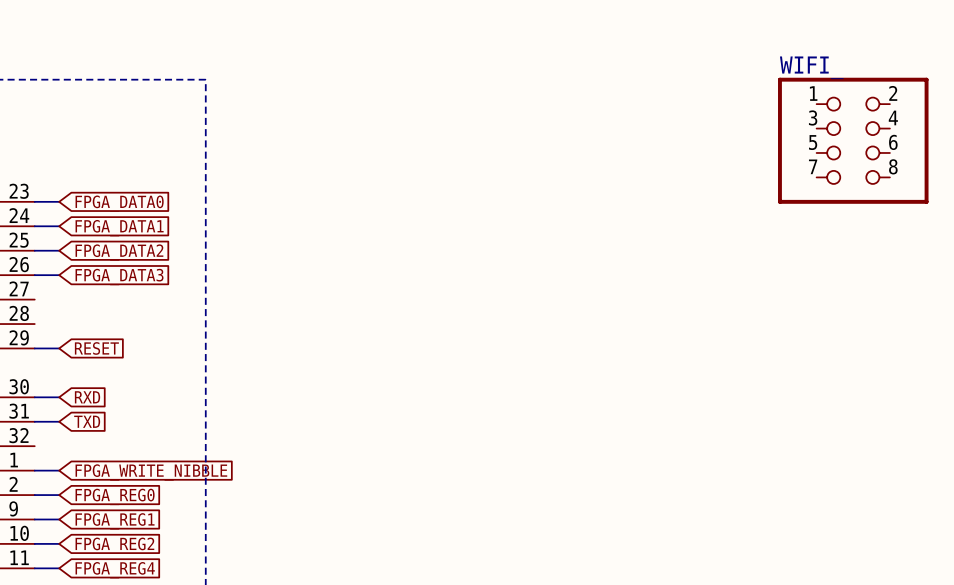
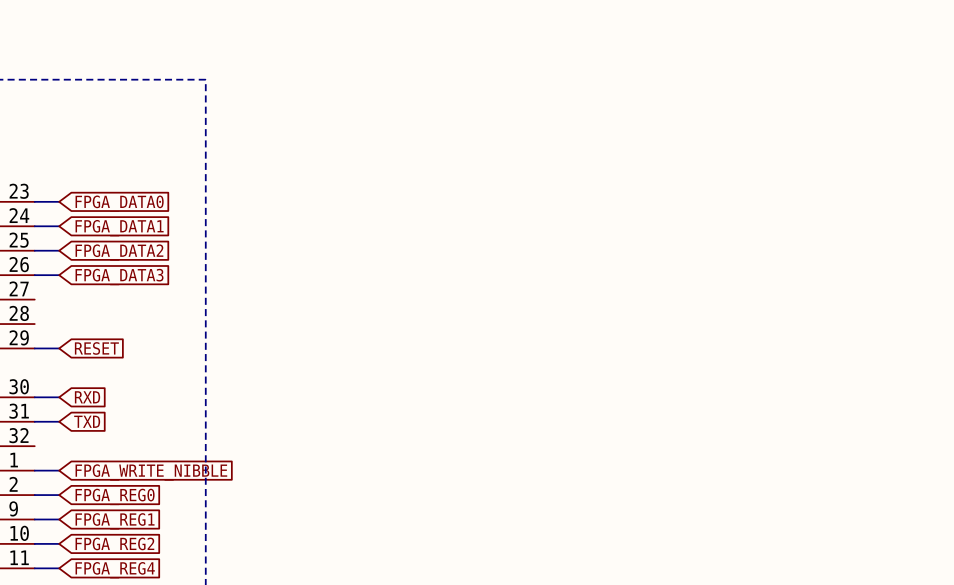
WIFI_: (853, 140) -> none

